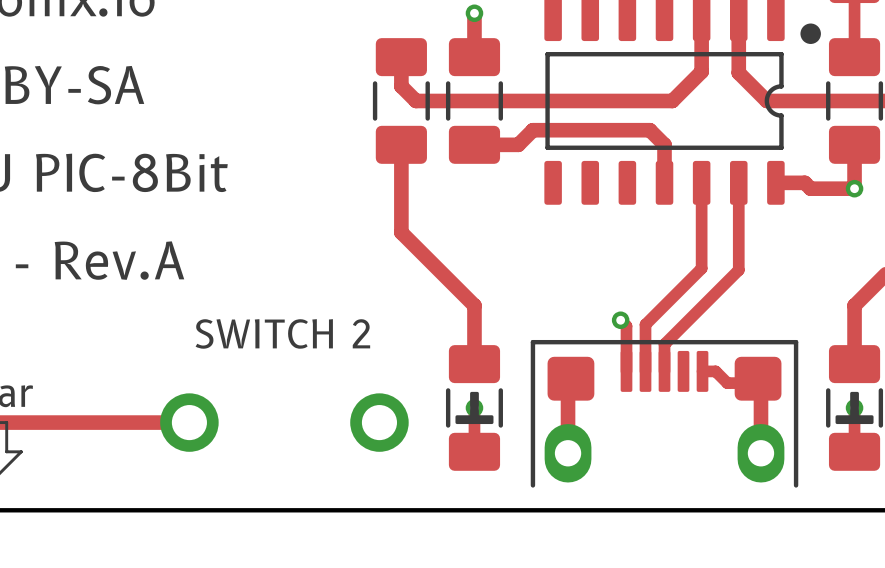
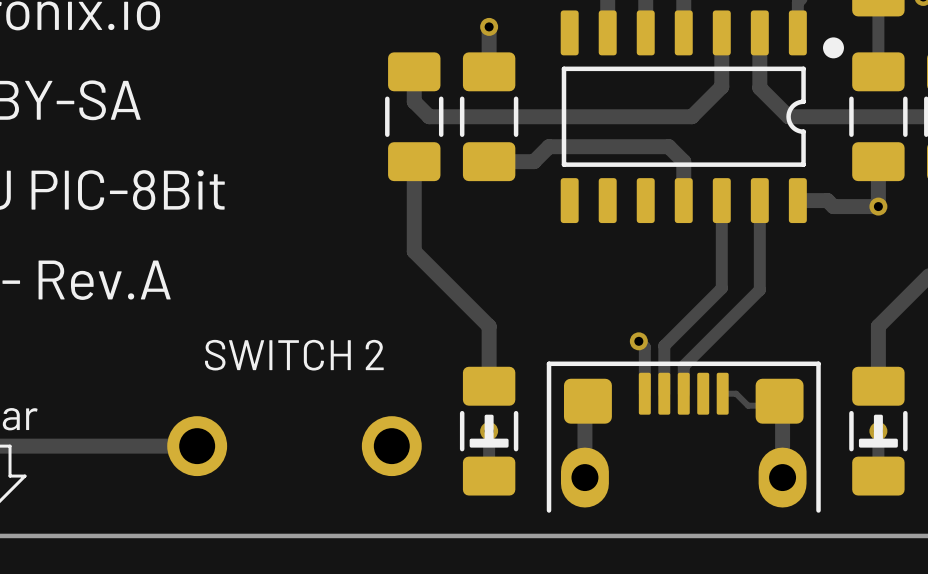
track width: thick (702, 371) (715, 371) (727, 383) (758, 383) -> thin (722, 393) (736, 393) (748, 405) (779, 405)

